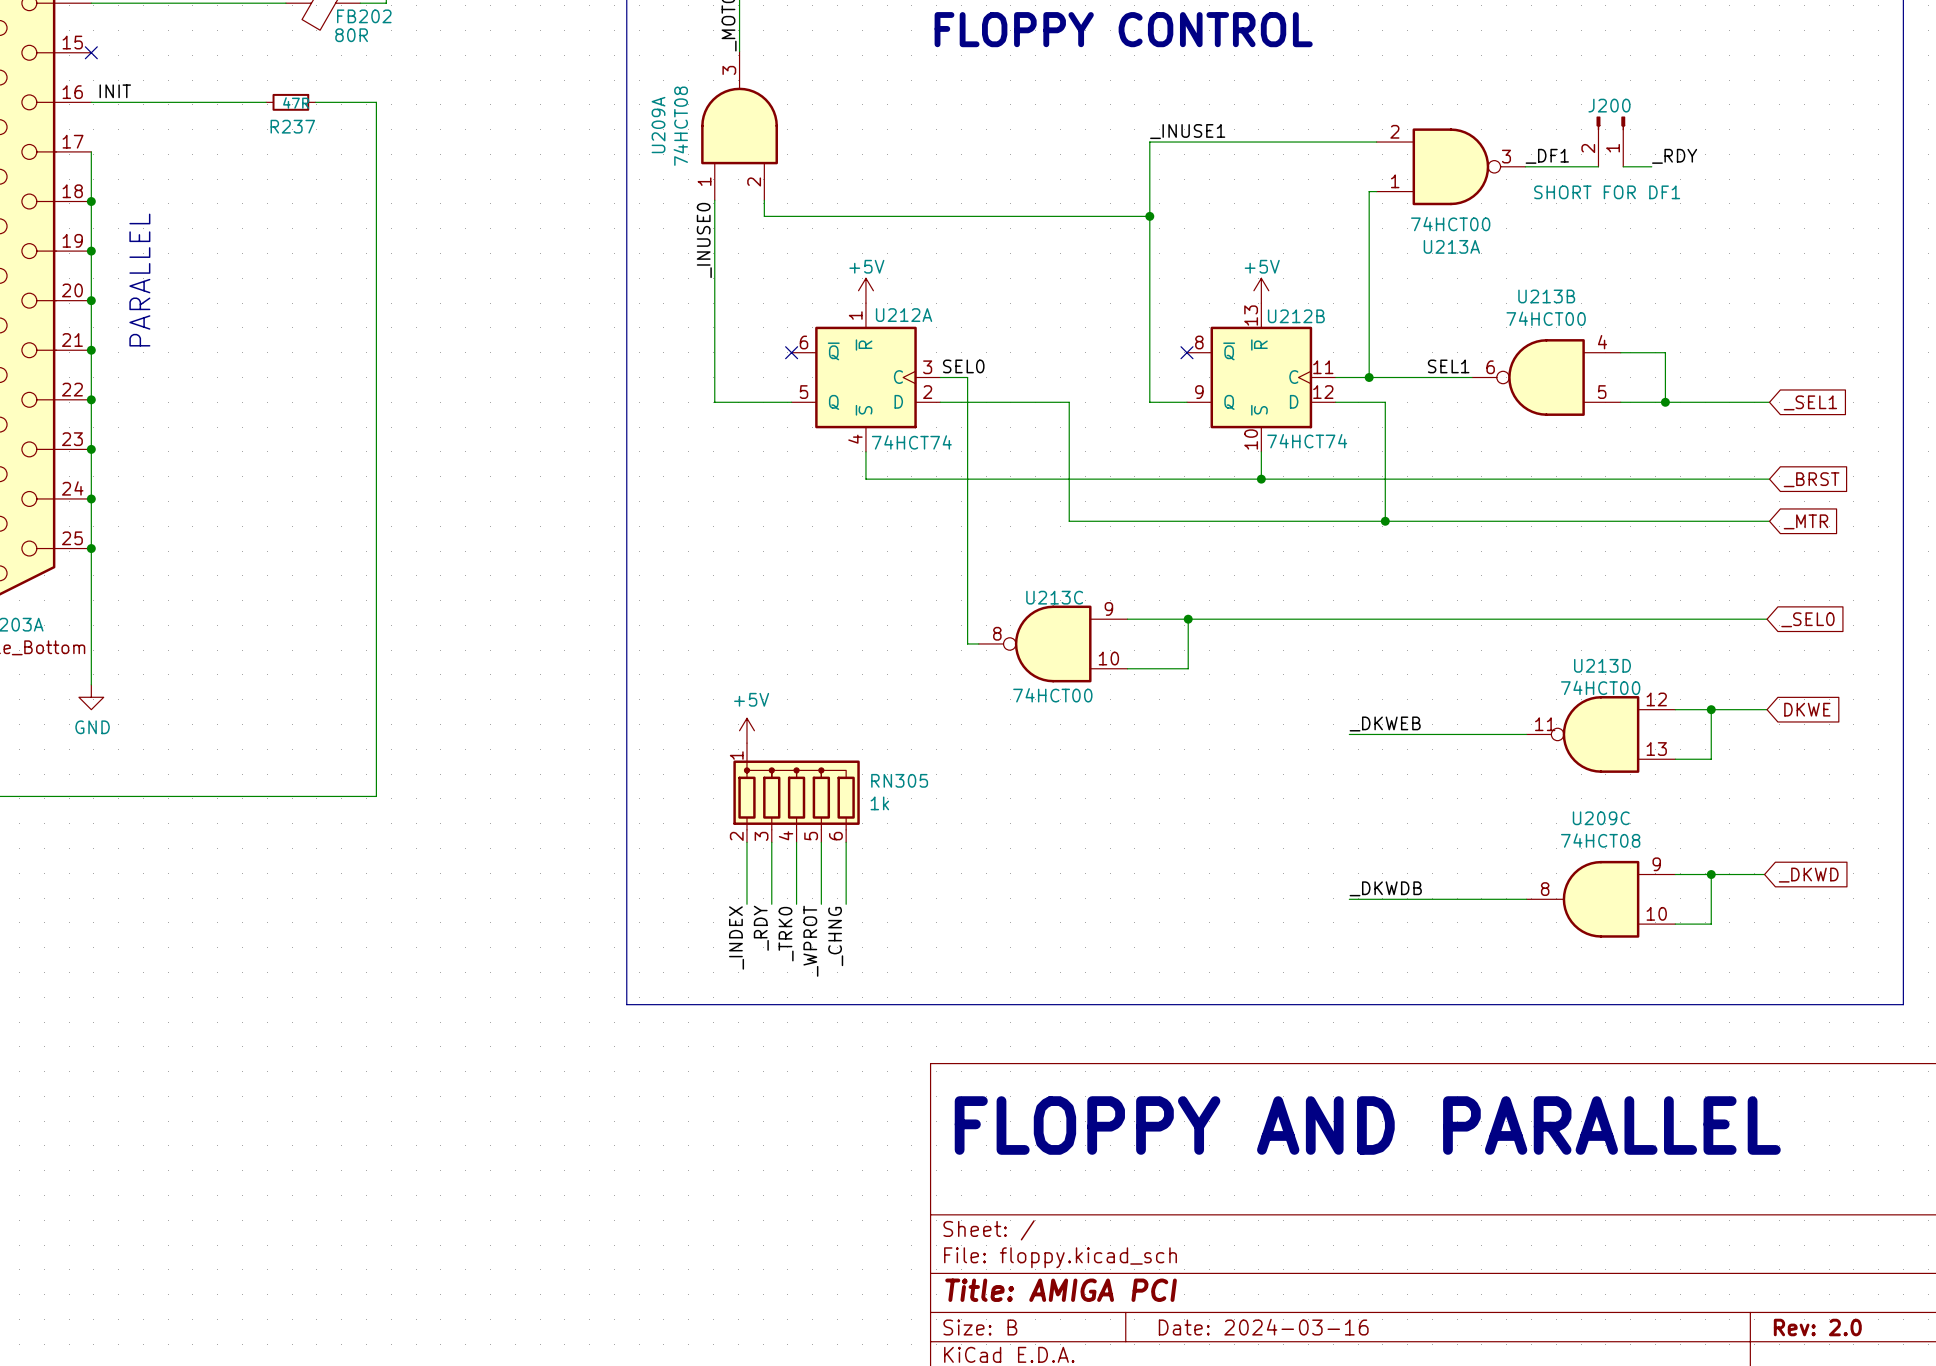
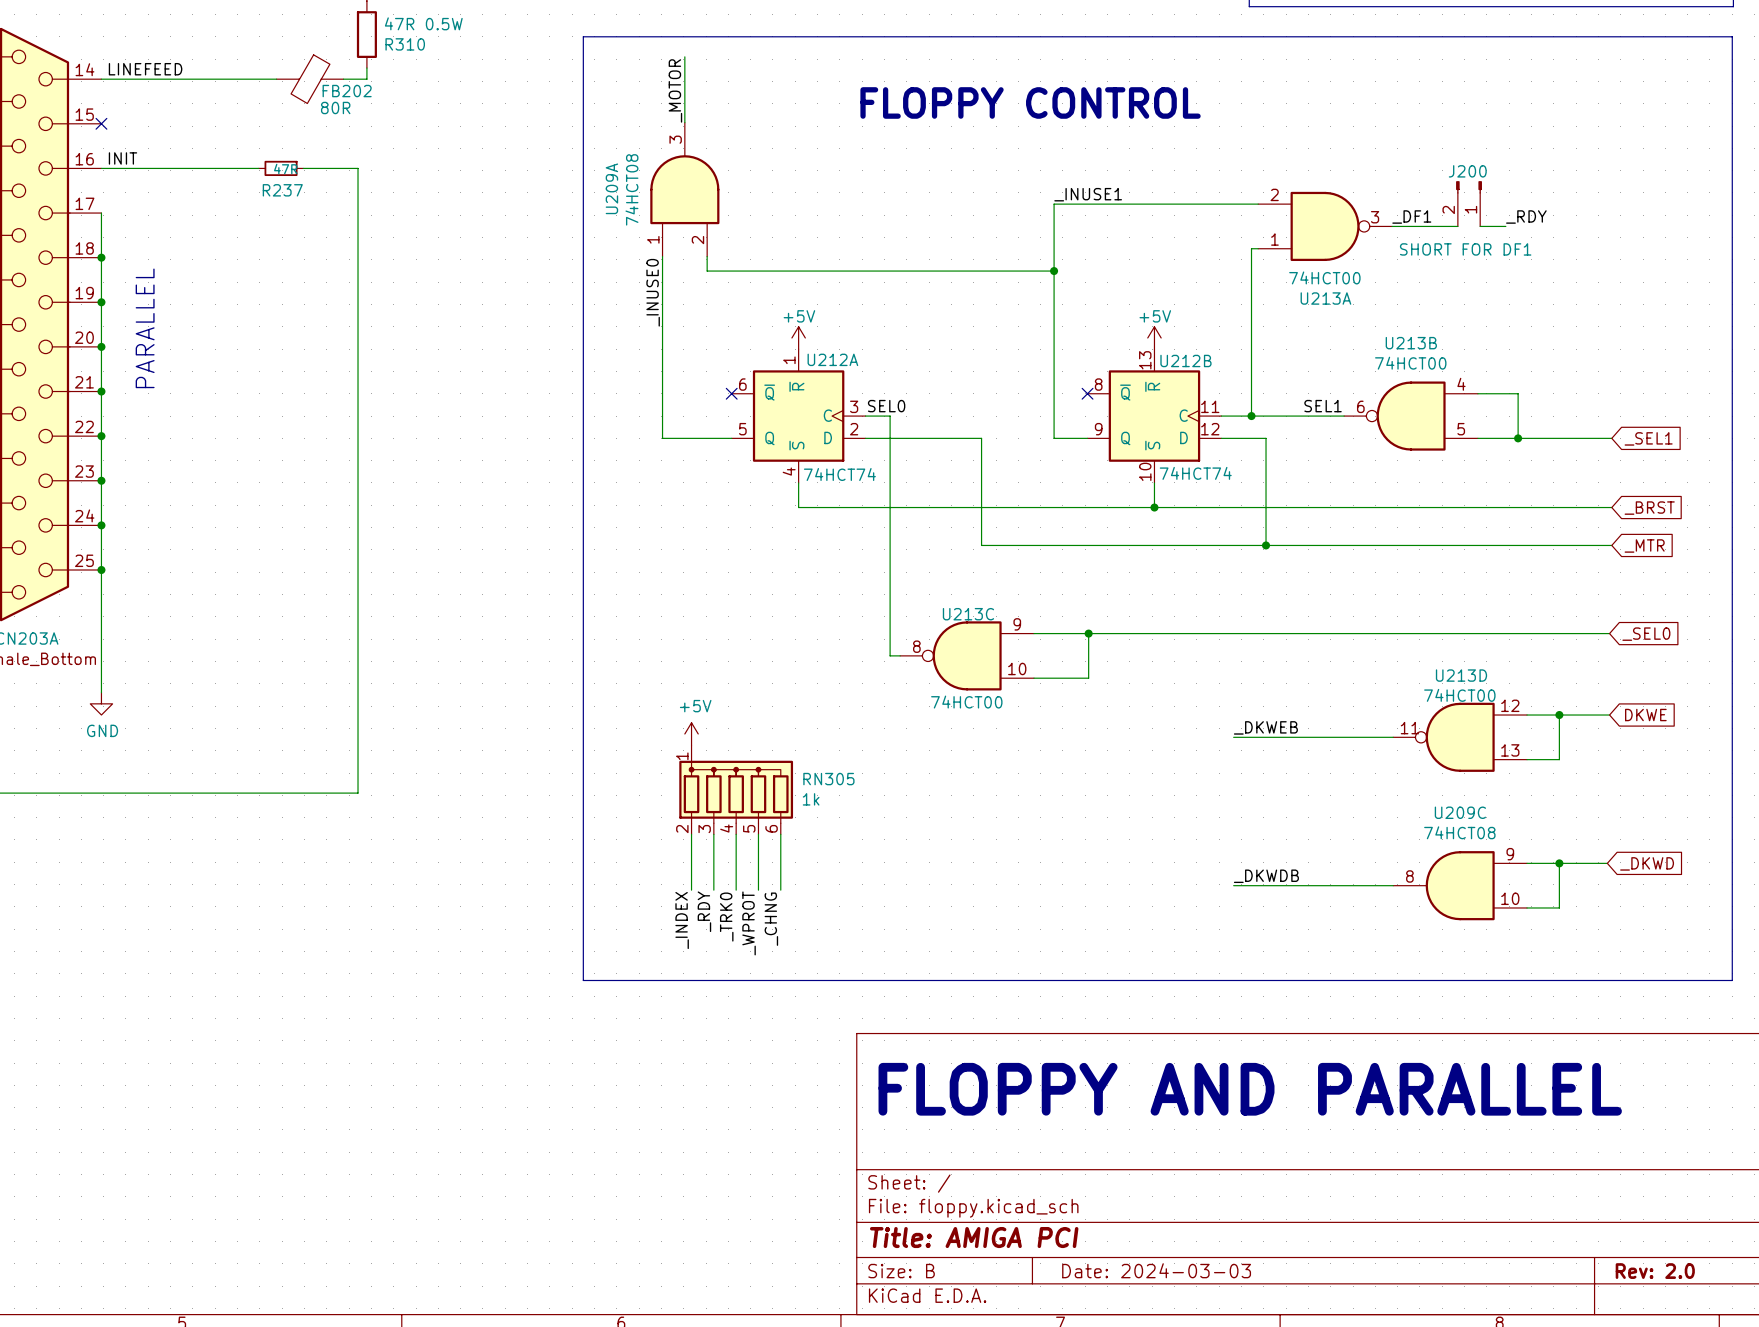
title block: Date: 2024-03-16 (1263, 1327) -> Date: 2024-03-03 (1156, 1270)

